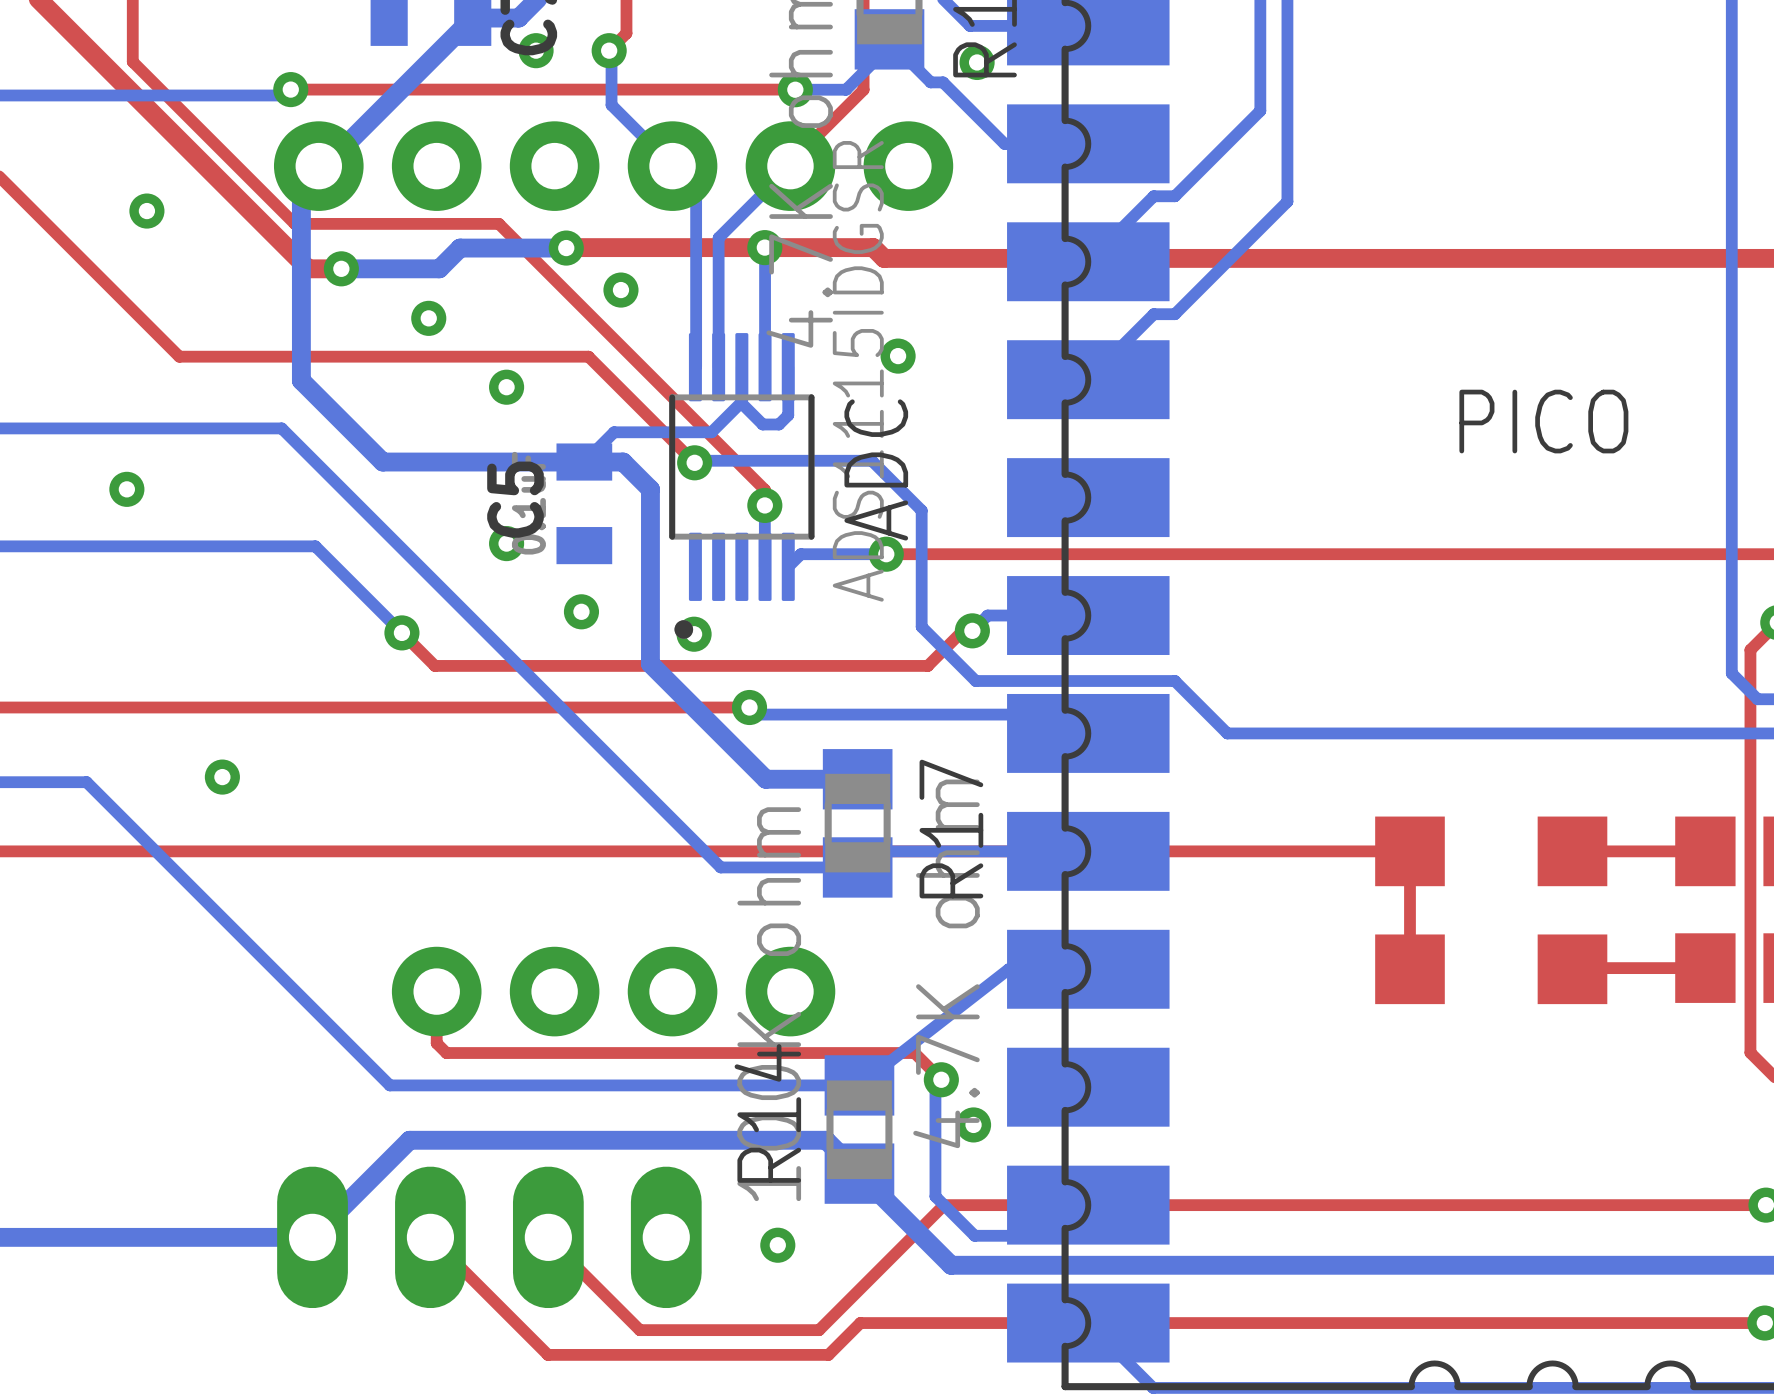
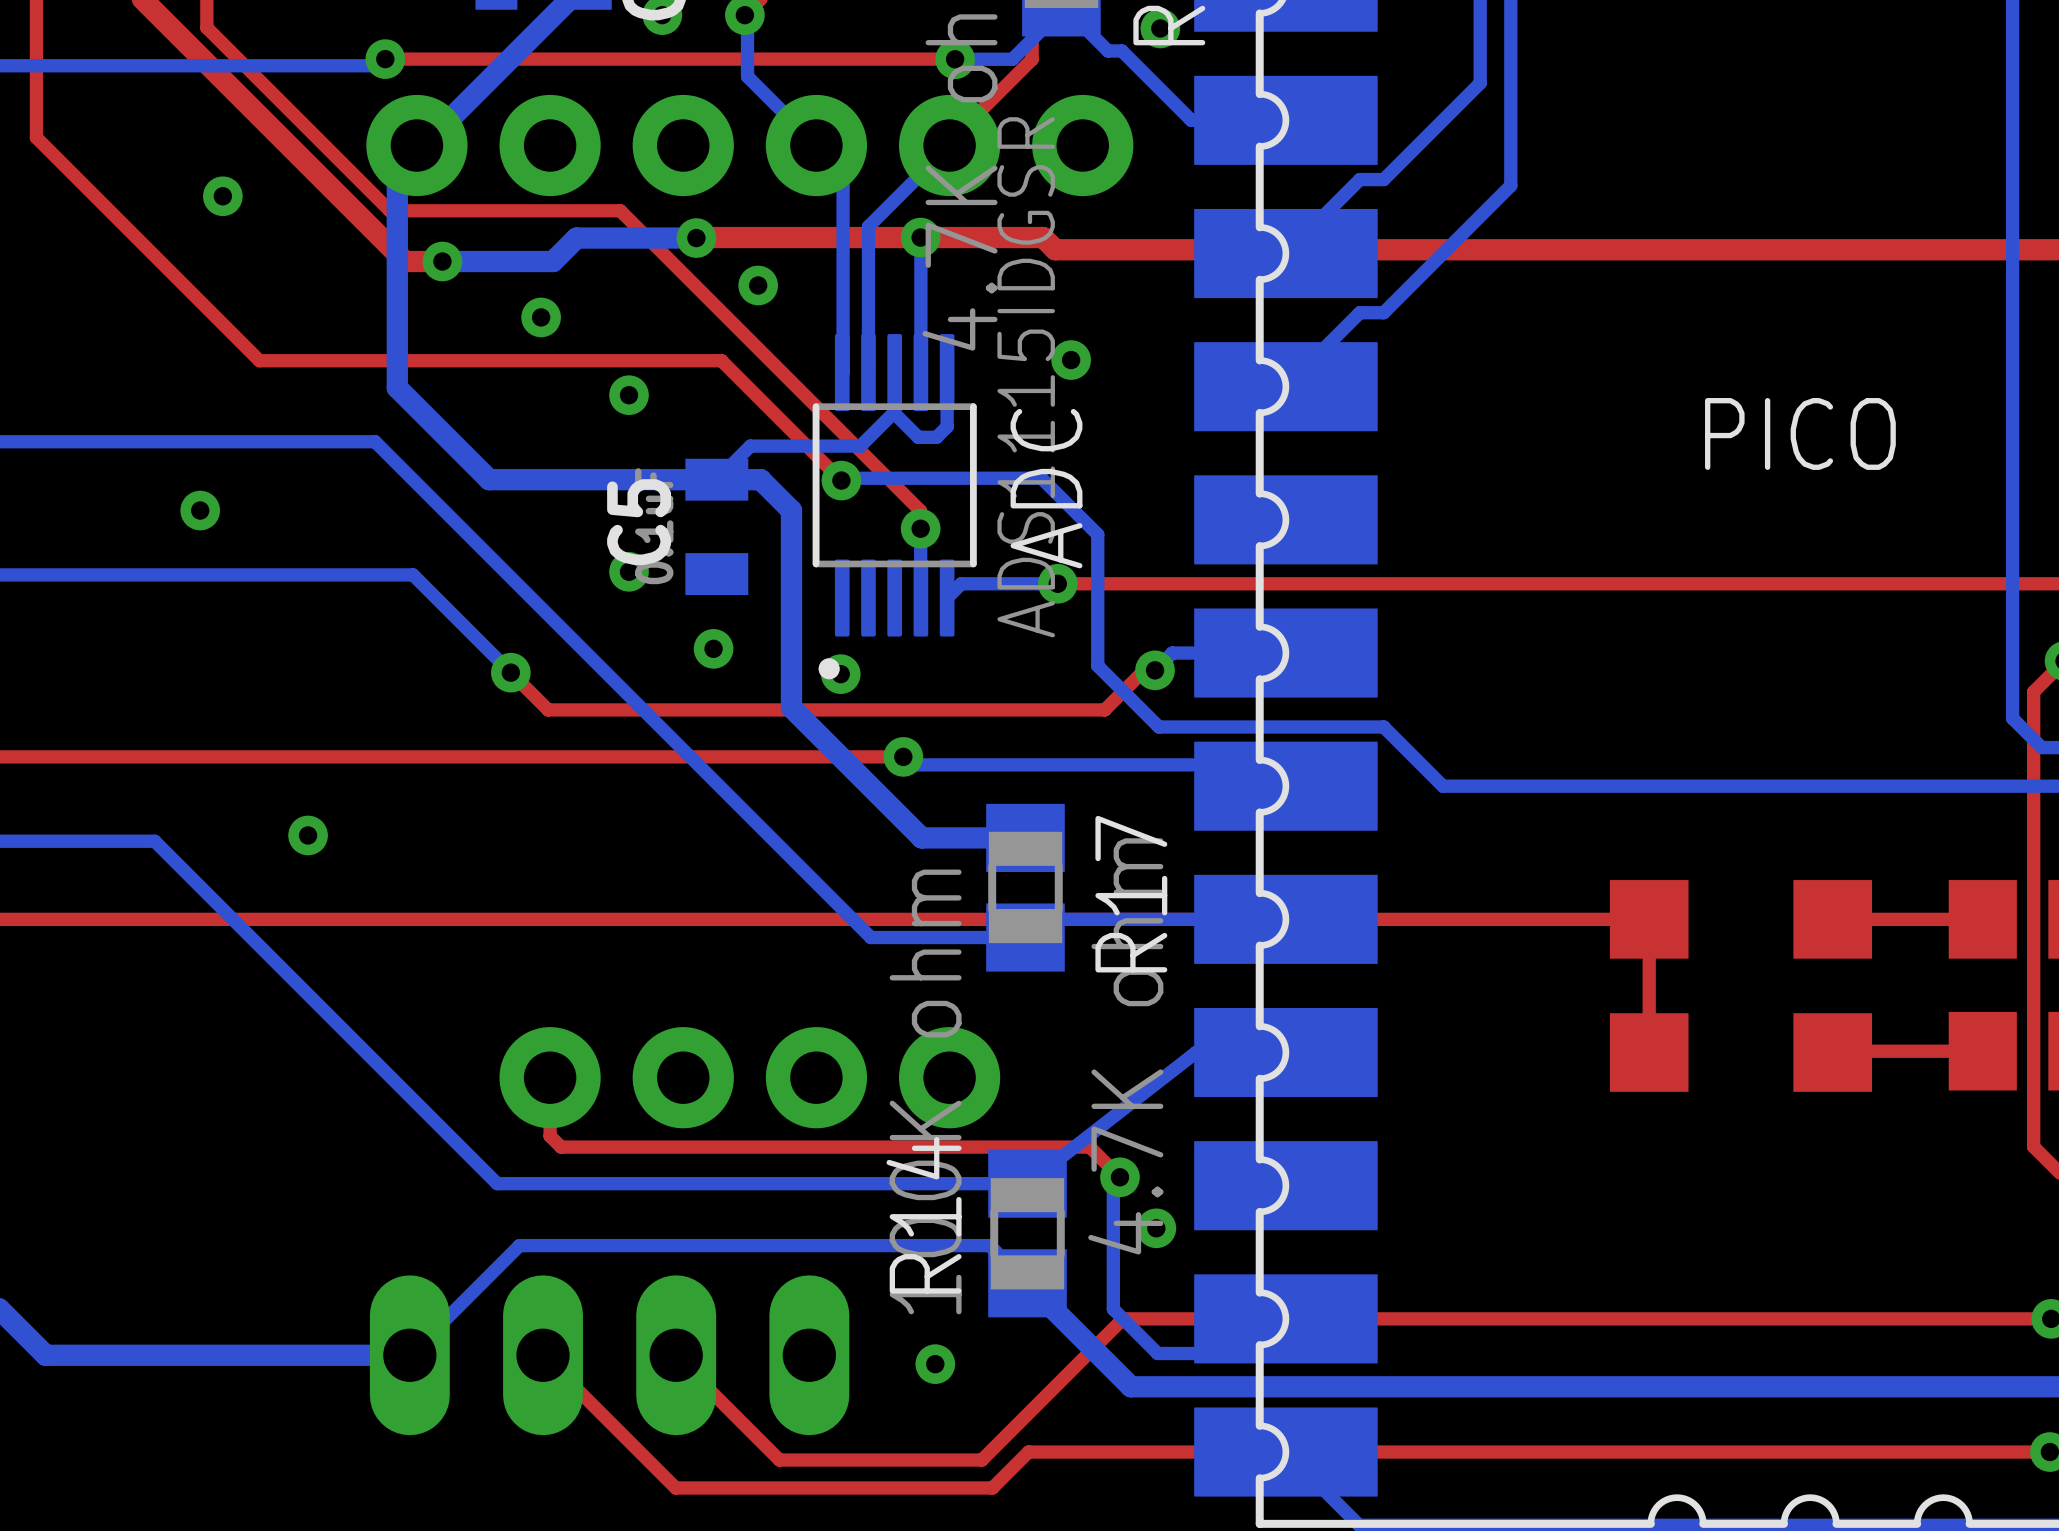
bottom track width: thick (859, 1173) (826, 1140) (409, 1140) (312, 1237) -> thin (1027, 1283) (989, 1245) (519, 1245) (409, 1355)

